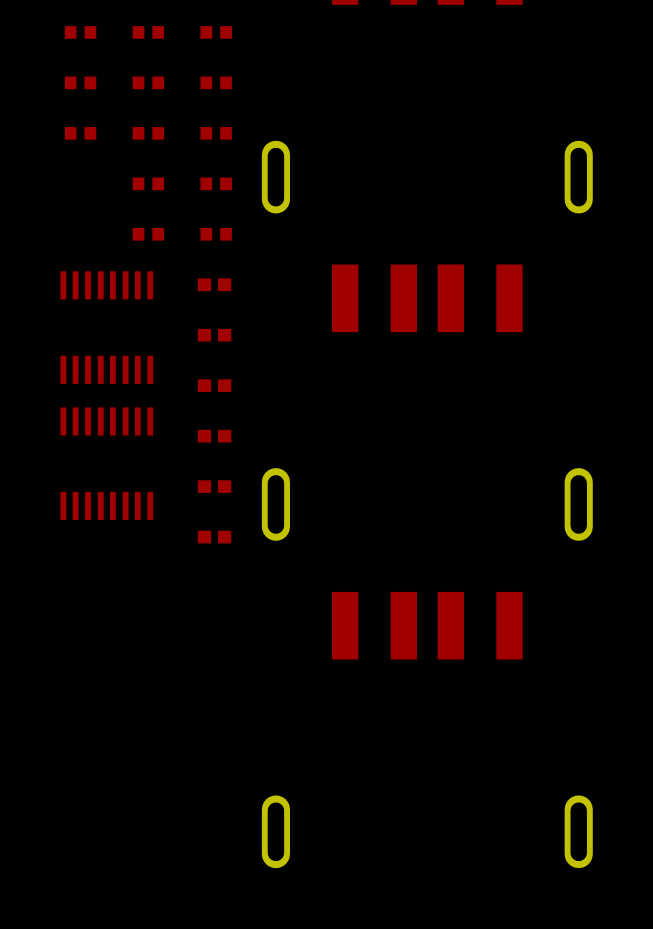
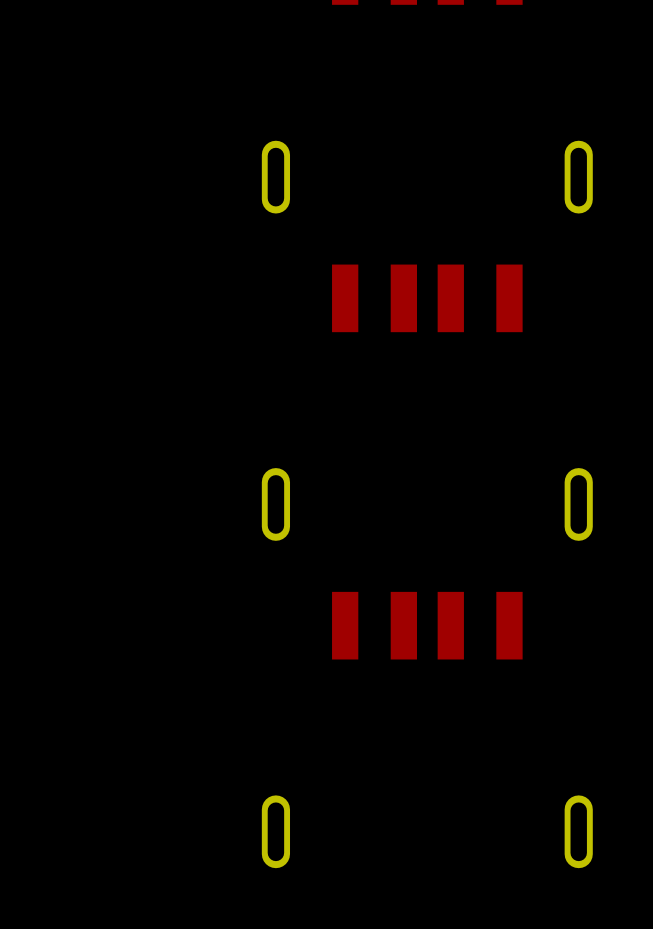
part: (80, 32) -> none
part: (148, 32) -> none
part: (216, 32) -> none
part: (80, 82) -> none
part: (148, 82) -> none
part: (216, 82) -> none
part: (80, 133) -> none
part: (148, 133) -> none
part: (216, 133) -> none
part: (148, 183) -> none
part: (216, 183) -> none
part: (148, 234) -> none
part: (216, 234) -> none
part: (214, 284) -> none
part: (106, 327) -> none
part: (214, 335) -> none
part: (214, 385) -> none
part: (214, 436) -> none
part: (106, 463) -> none
part: (214, 486) -> none
part: (214, 537) -> none

